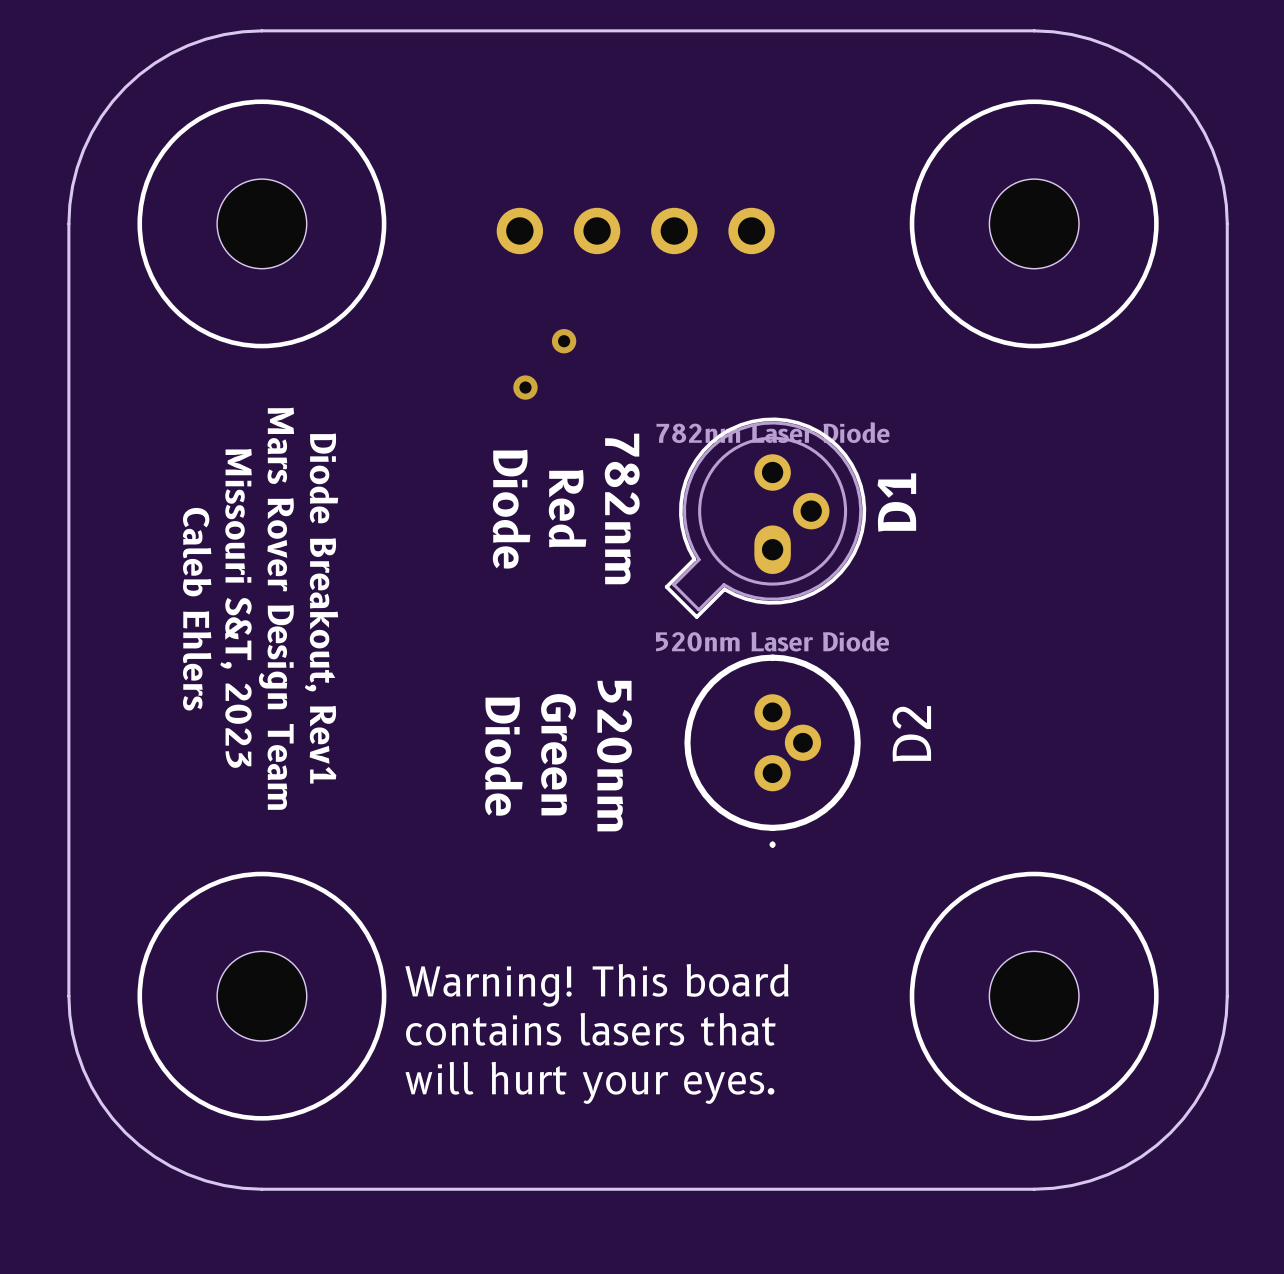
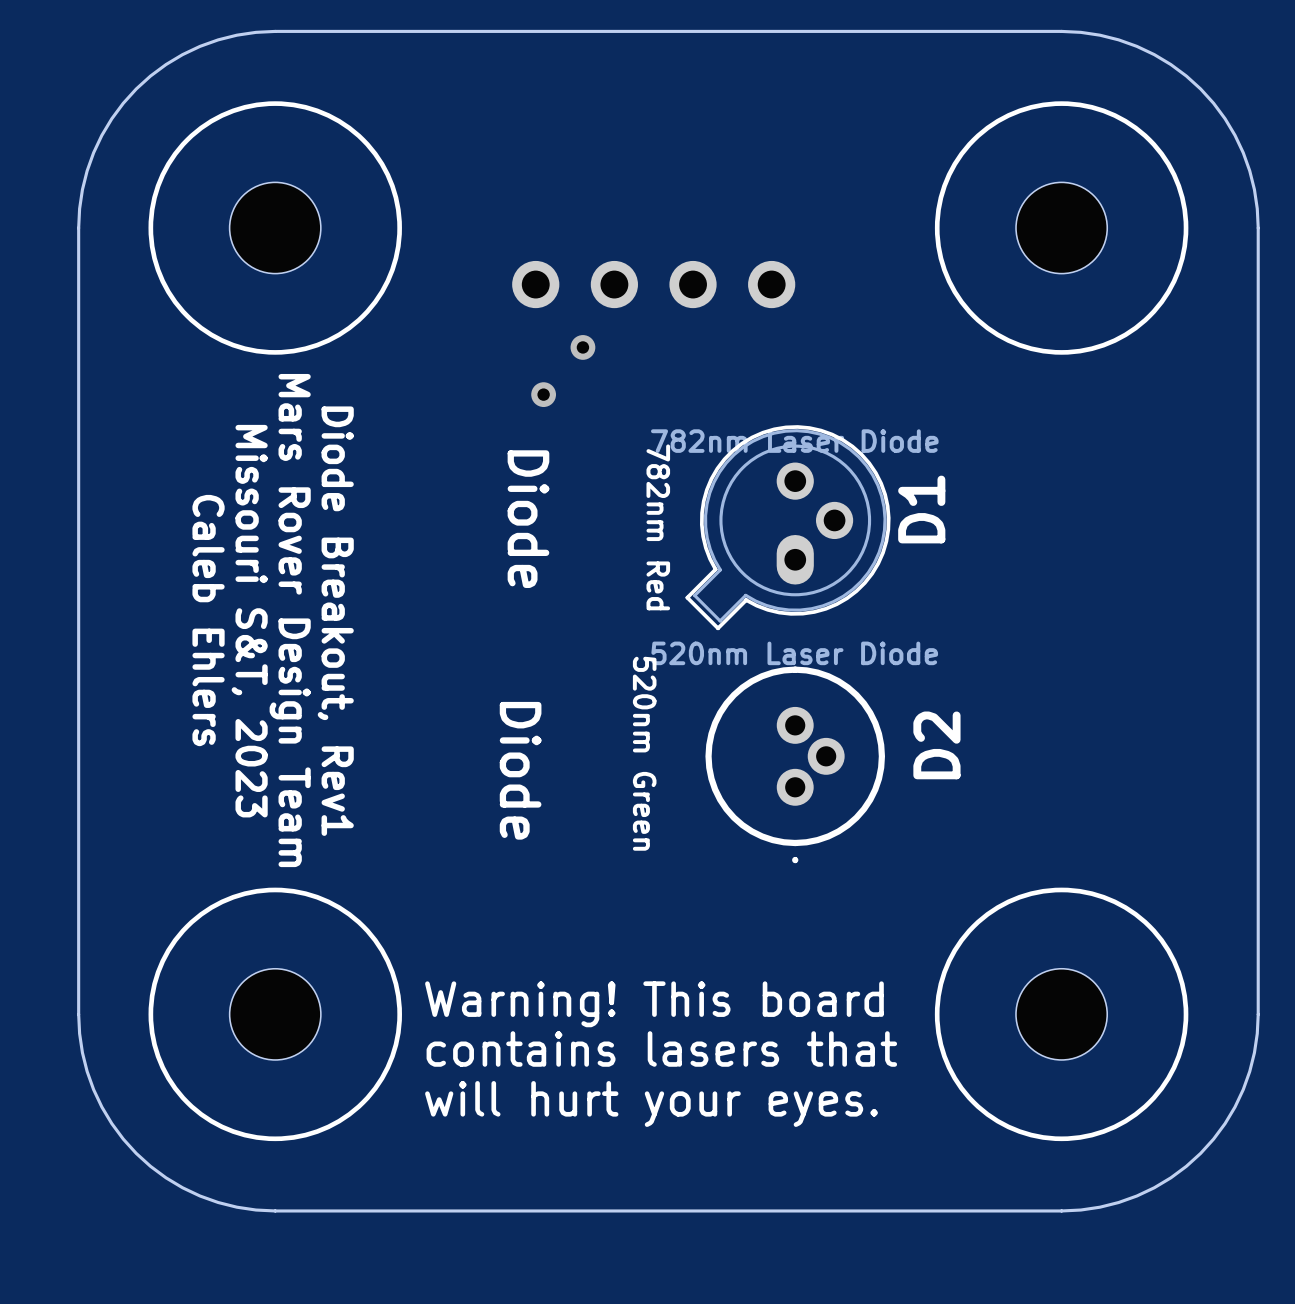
part position: (635, 230) -> (653, 284)
text: Red (567, 508) -> none
text: 782nm (622, 508) -> 782nm Red (658, 527)
text: Green (558, 754) -> none
text: 520nm (614, 756) -> 520nm Green (644, 753)

